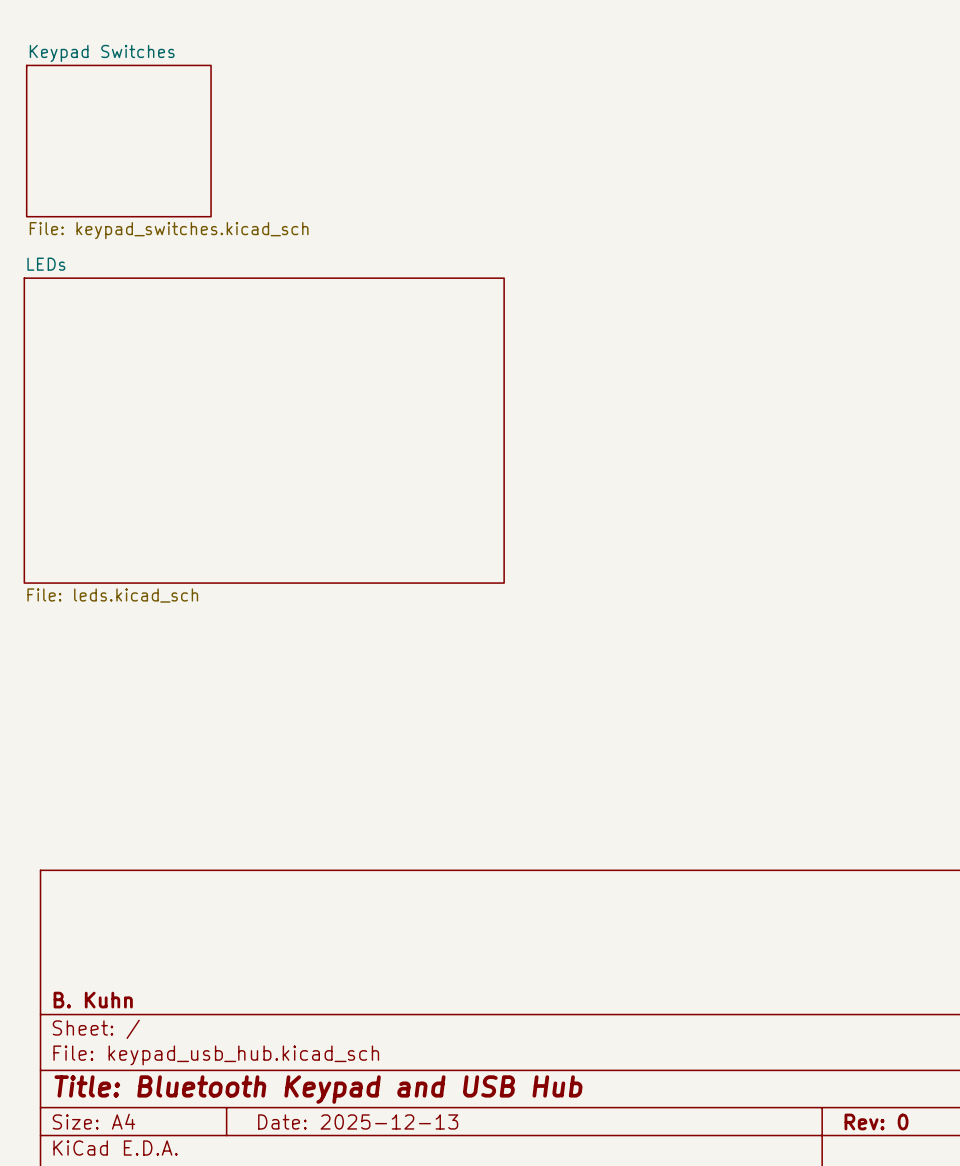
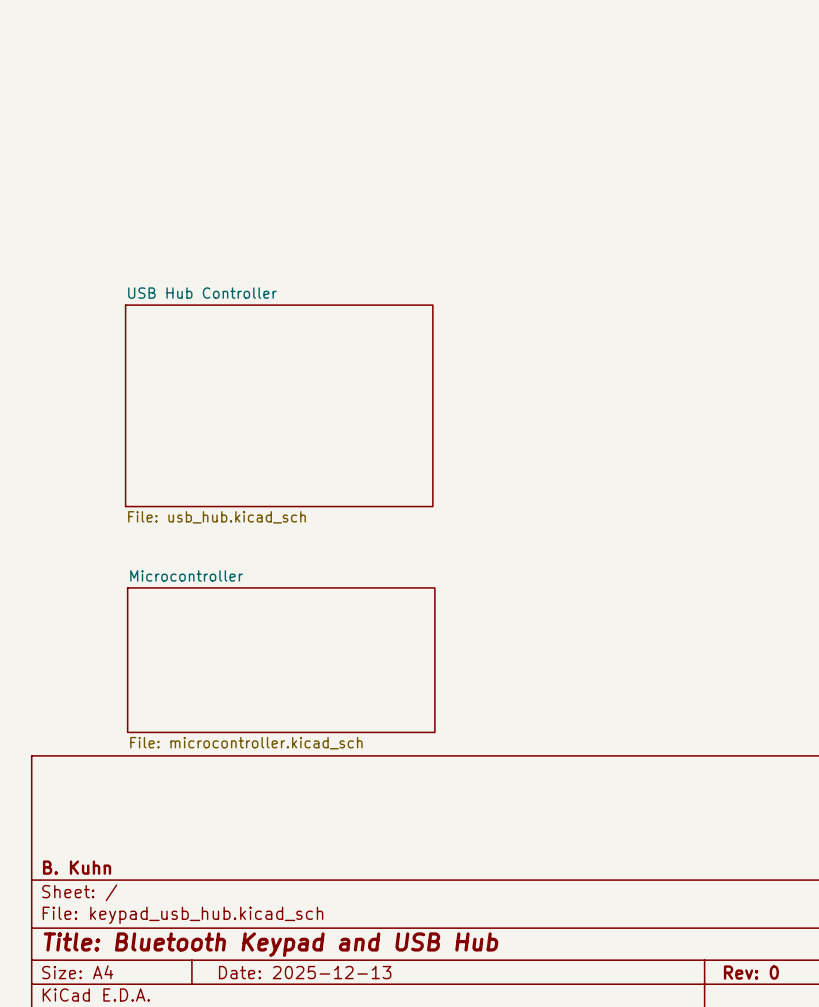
sheet Keypad Switches: File: keypad_switches.kicad_sch (118, 141) -> none
sheet LEDs: File: leds.kicad_sch (264, 430) -> none
sheet USB Hub Controller: none -> File: usb_hub.kicad_sch (279, 405)
sheet Microcontroller: none -> File: microcontroller.kicad_sch (281, 660)

